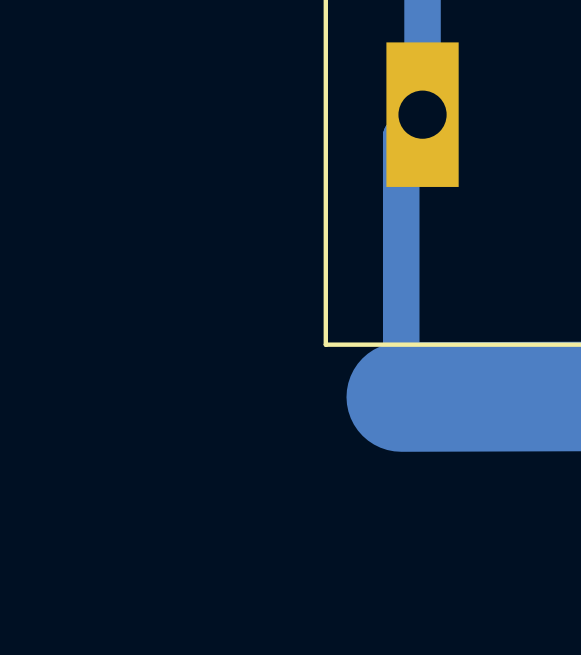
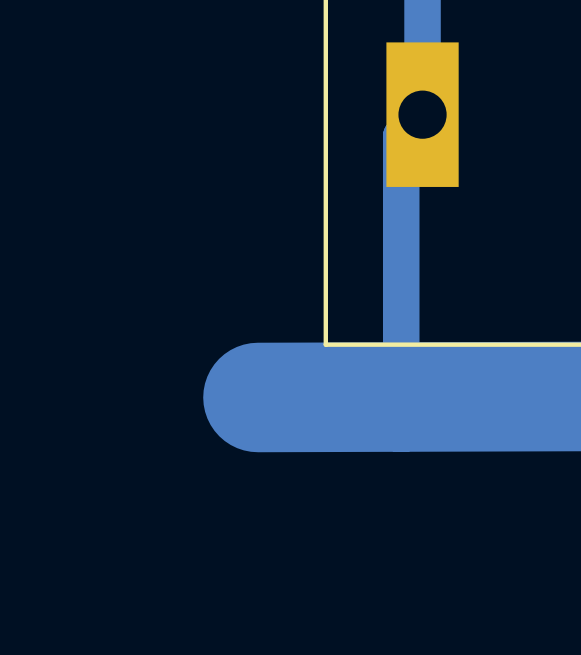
bottom track: none -> (401, 397) (257, 397)

